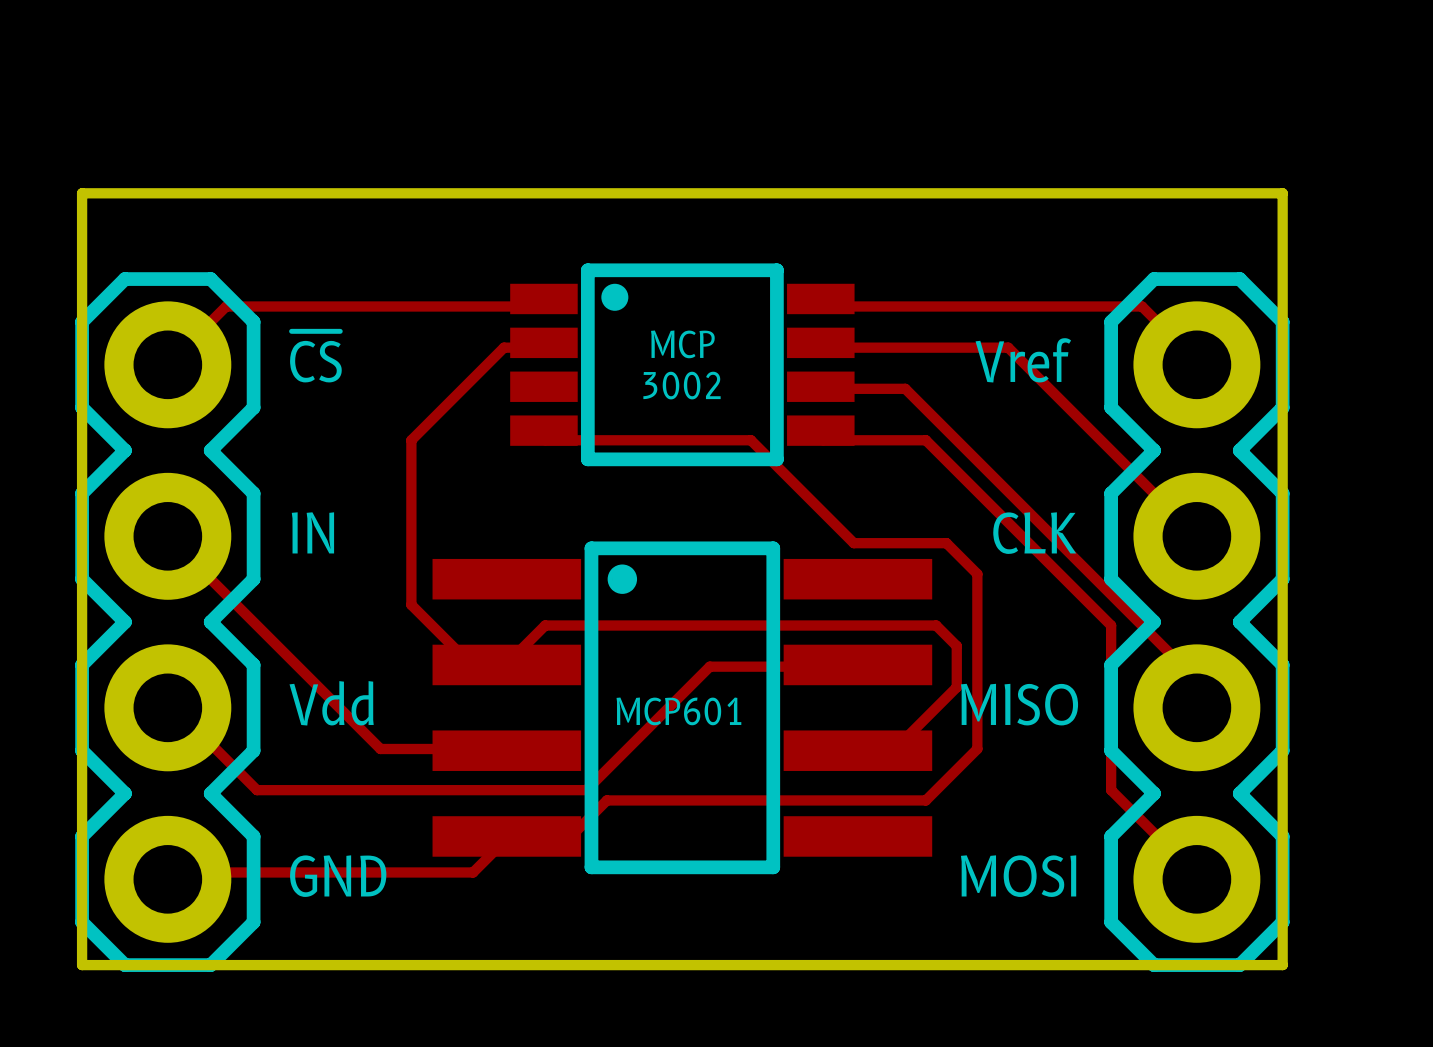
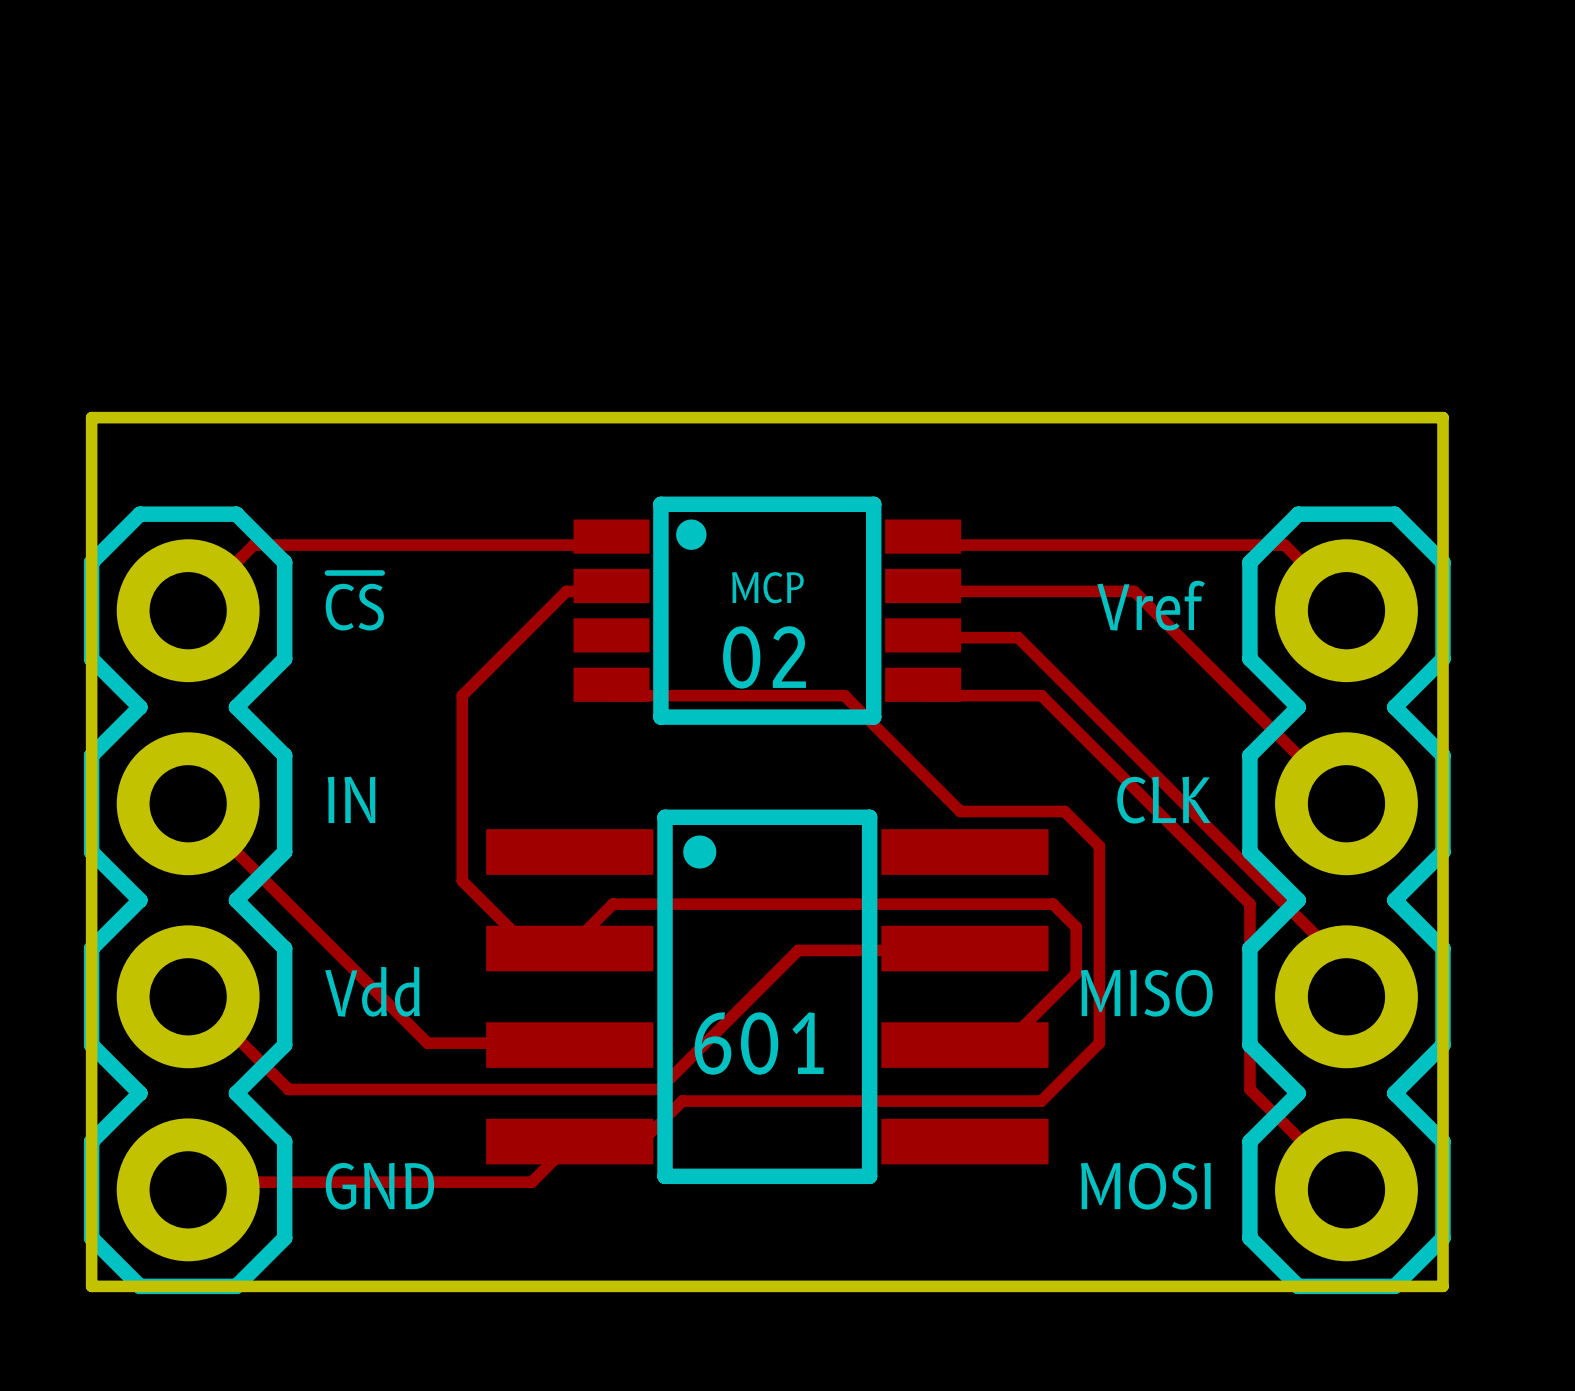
text: 3002 (682, 385) -> 02 (764, 657)
text: MCP601 (678, 711) -> 601 (759, 1043)

